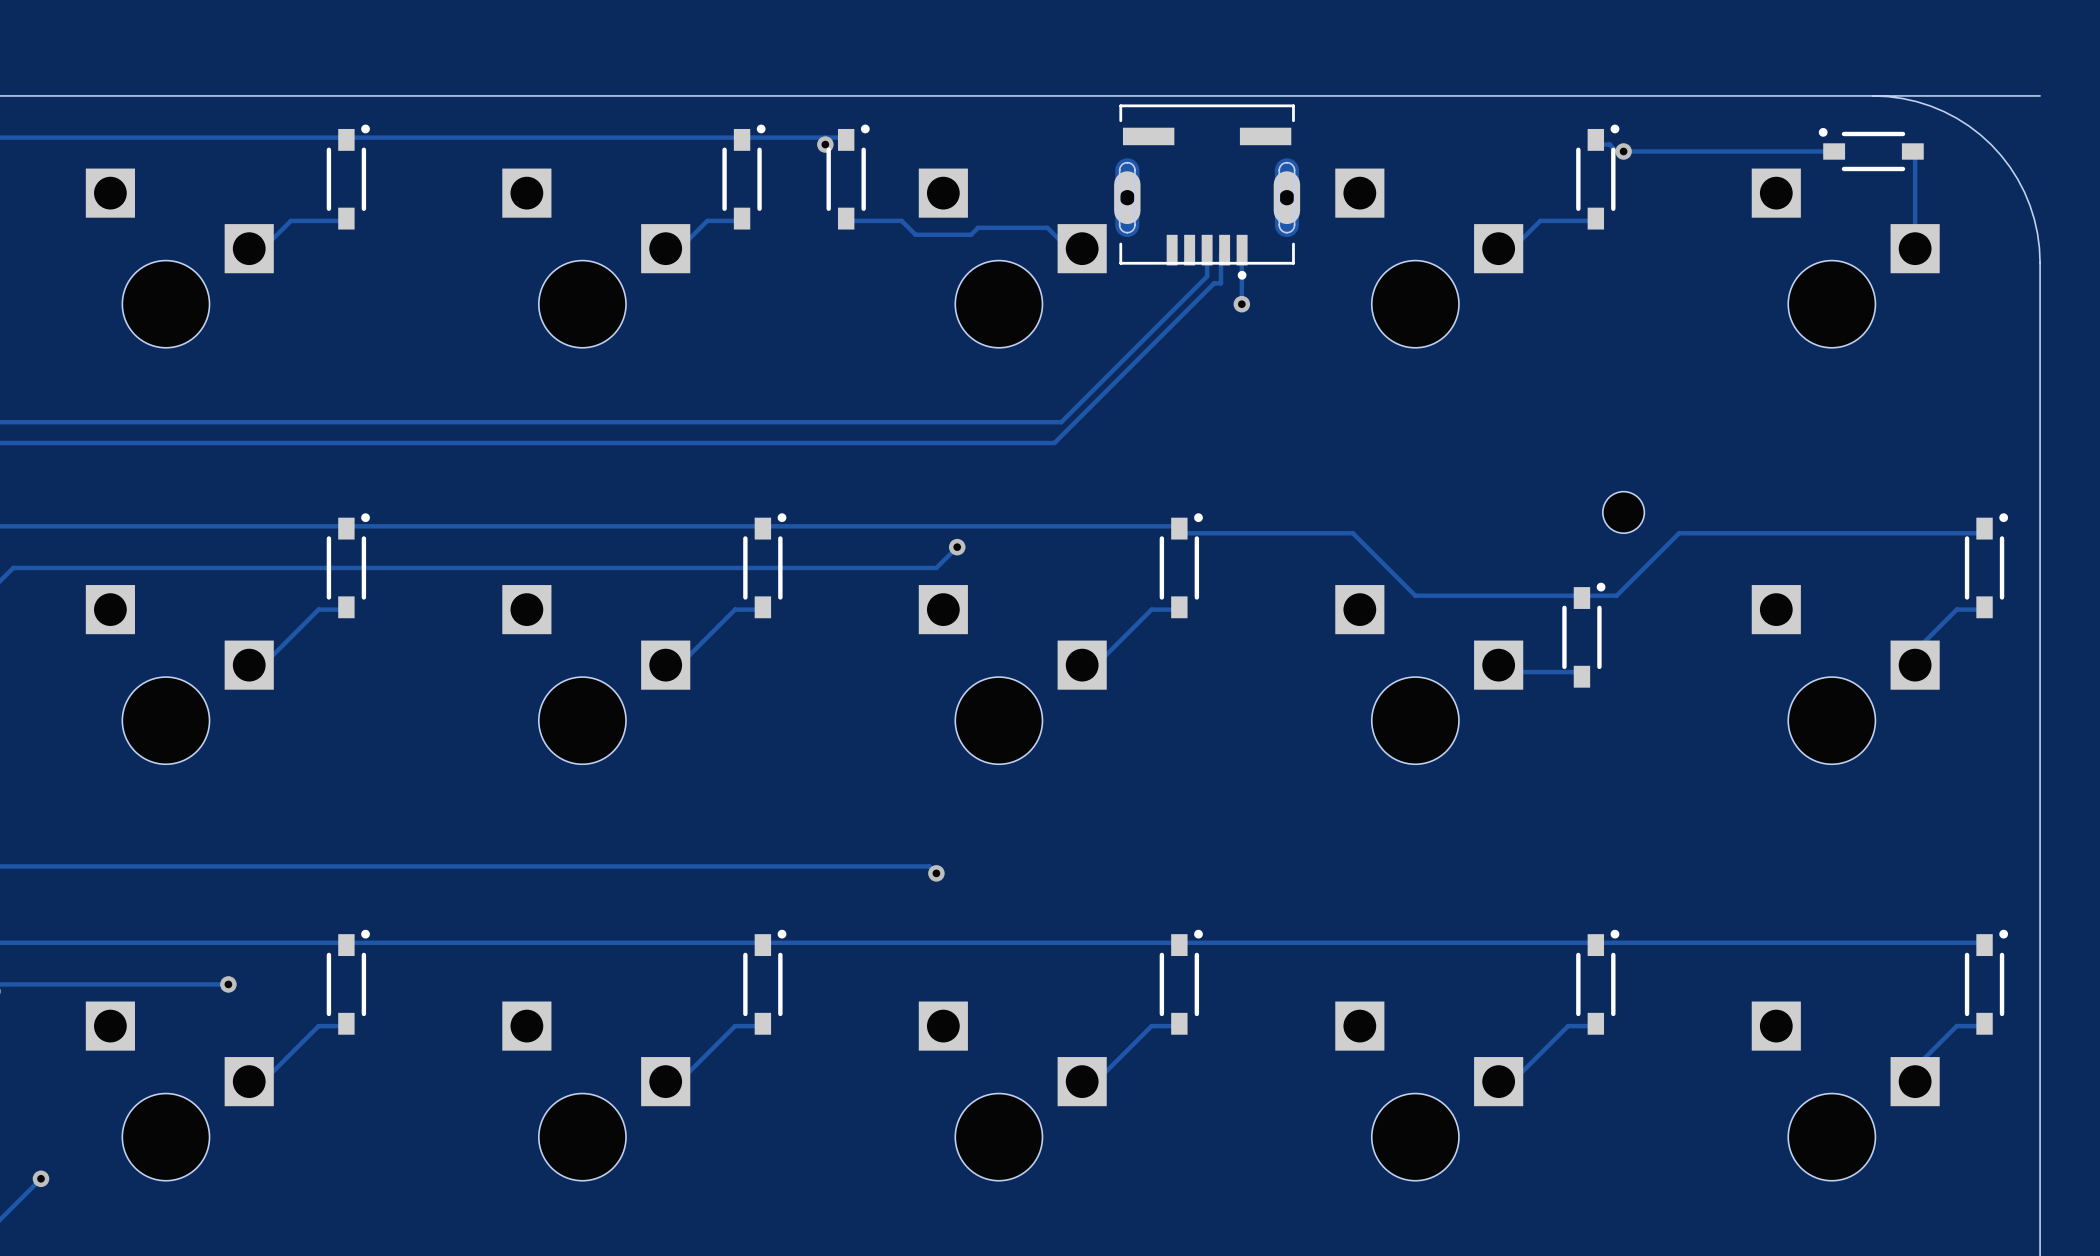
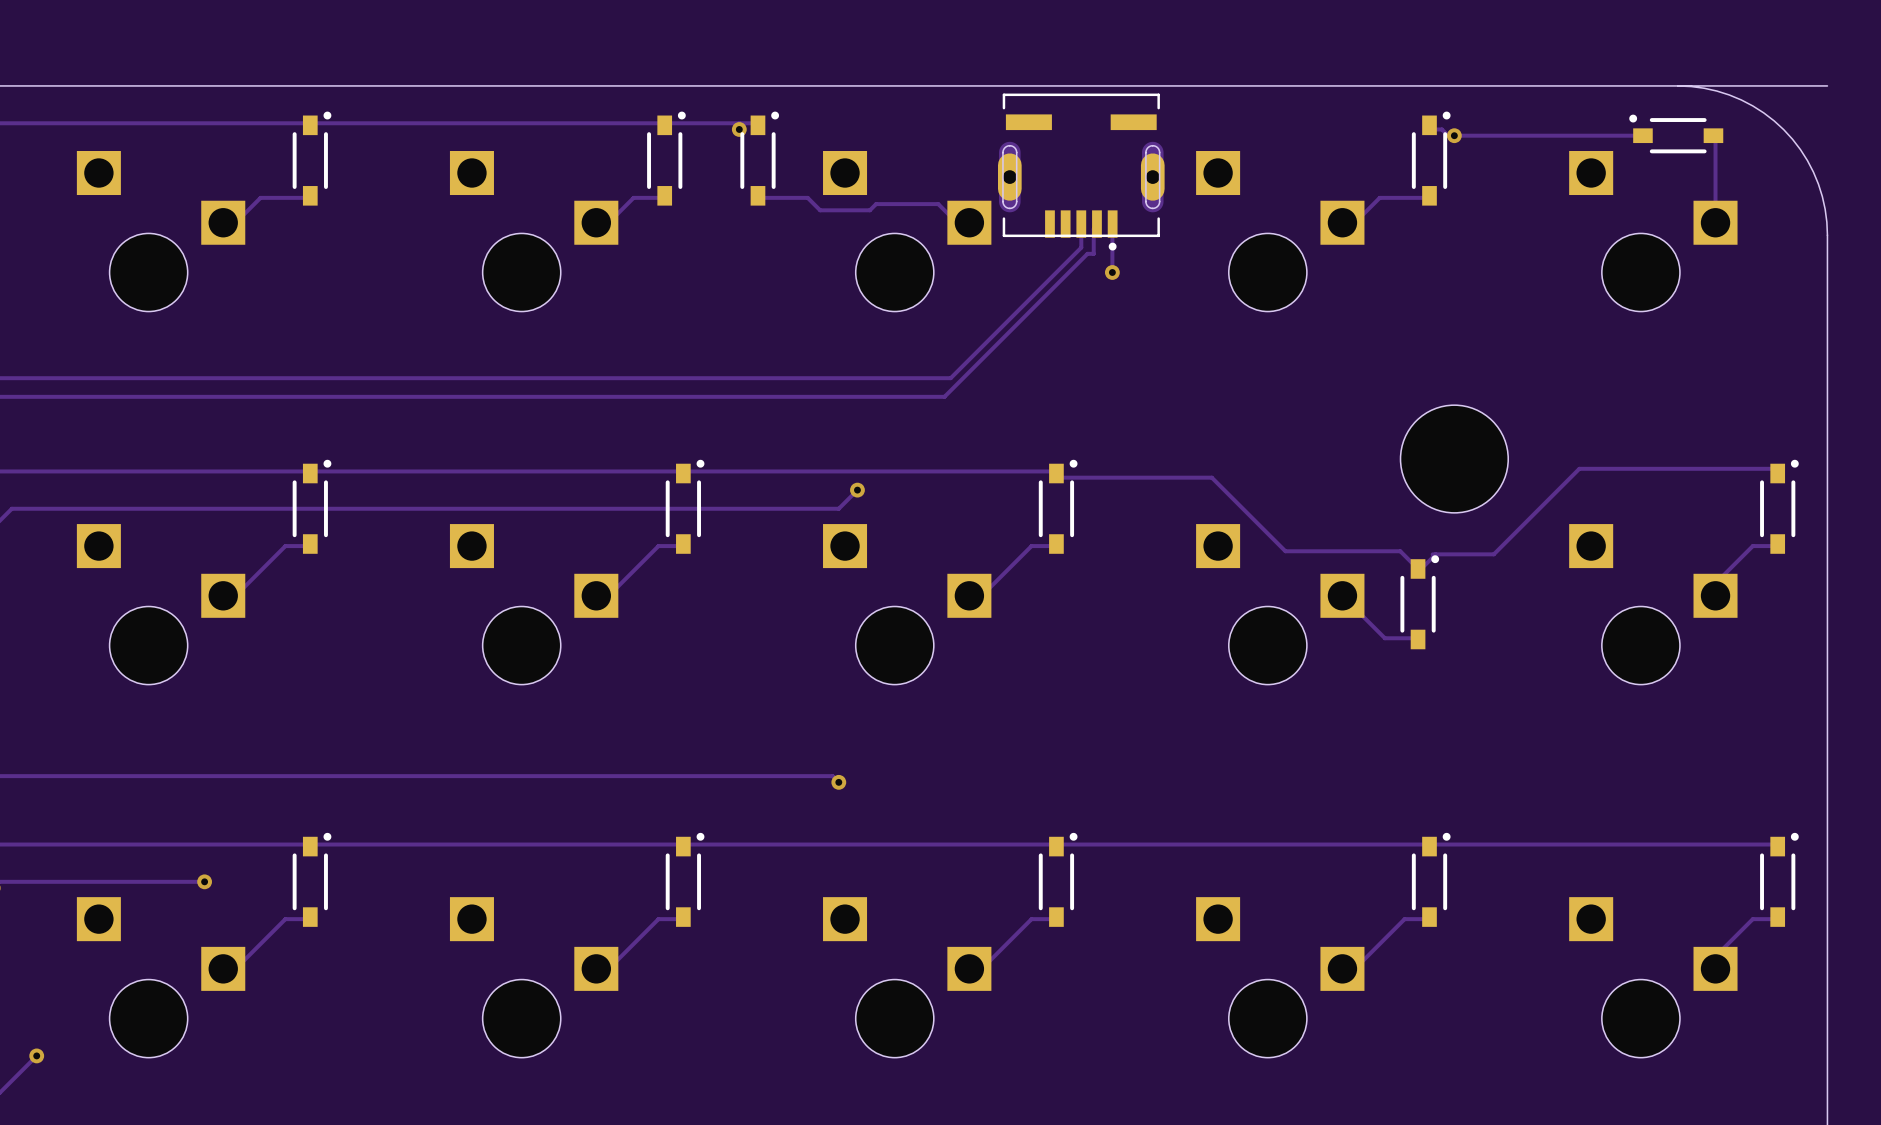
hole size: [1602, 491, 1645, 534] -> [1400, 405, 1509, 513]
track: (1984, 528) (1984, 533) (1679, 533) (1616, 595) (1415, 595) -> (1777, 473) (1772, 468) (1579, 468) (1493, 554) (1432, 554)
track: none -> (1267, 533) (1285, 551) (1400, 551) (1418, 568) (1421, 568) (1435, 554)
part position: (1583, 635) -> (1419, 602)
track: (1505, 672) (1581, 672) (1581, 676) -> (1348, 602) (1384, 638) (1418, 639)

